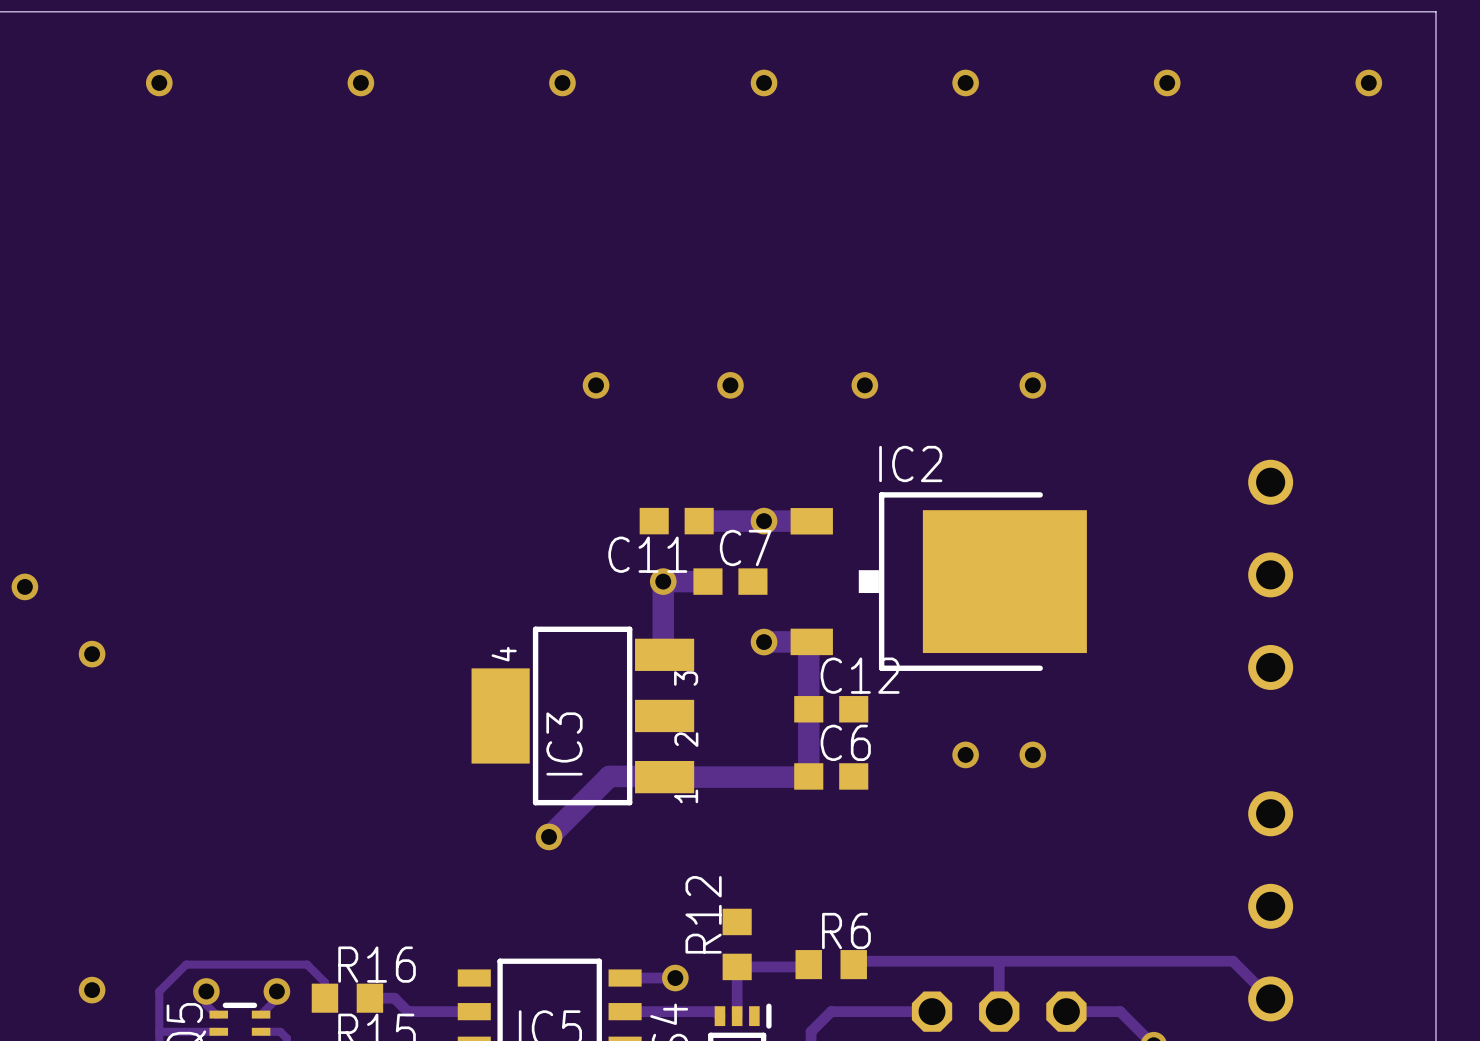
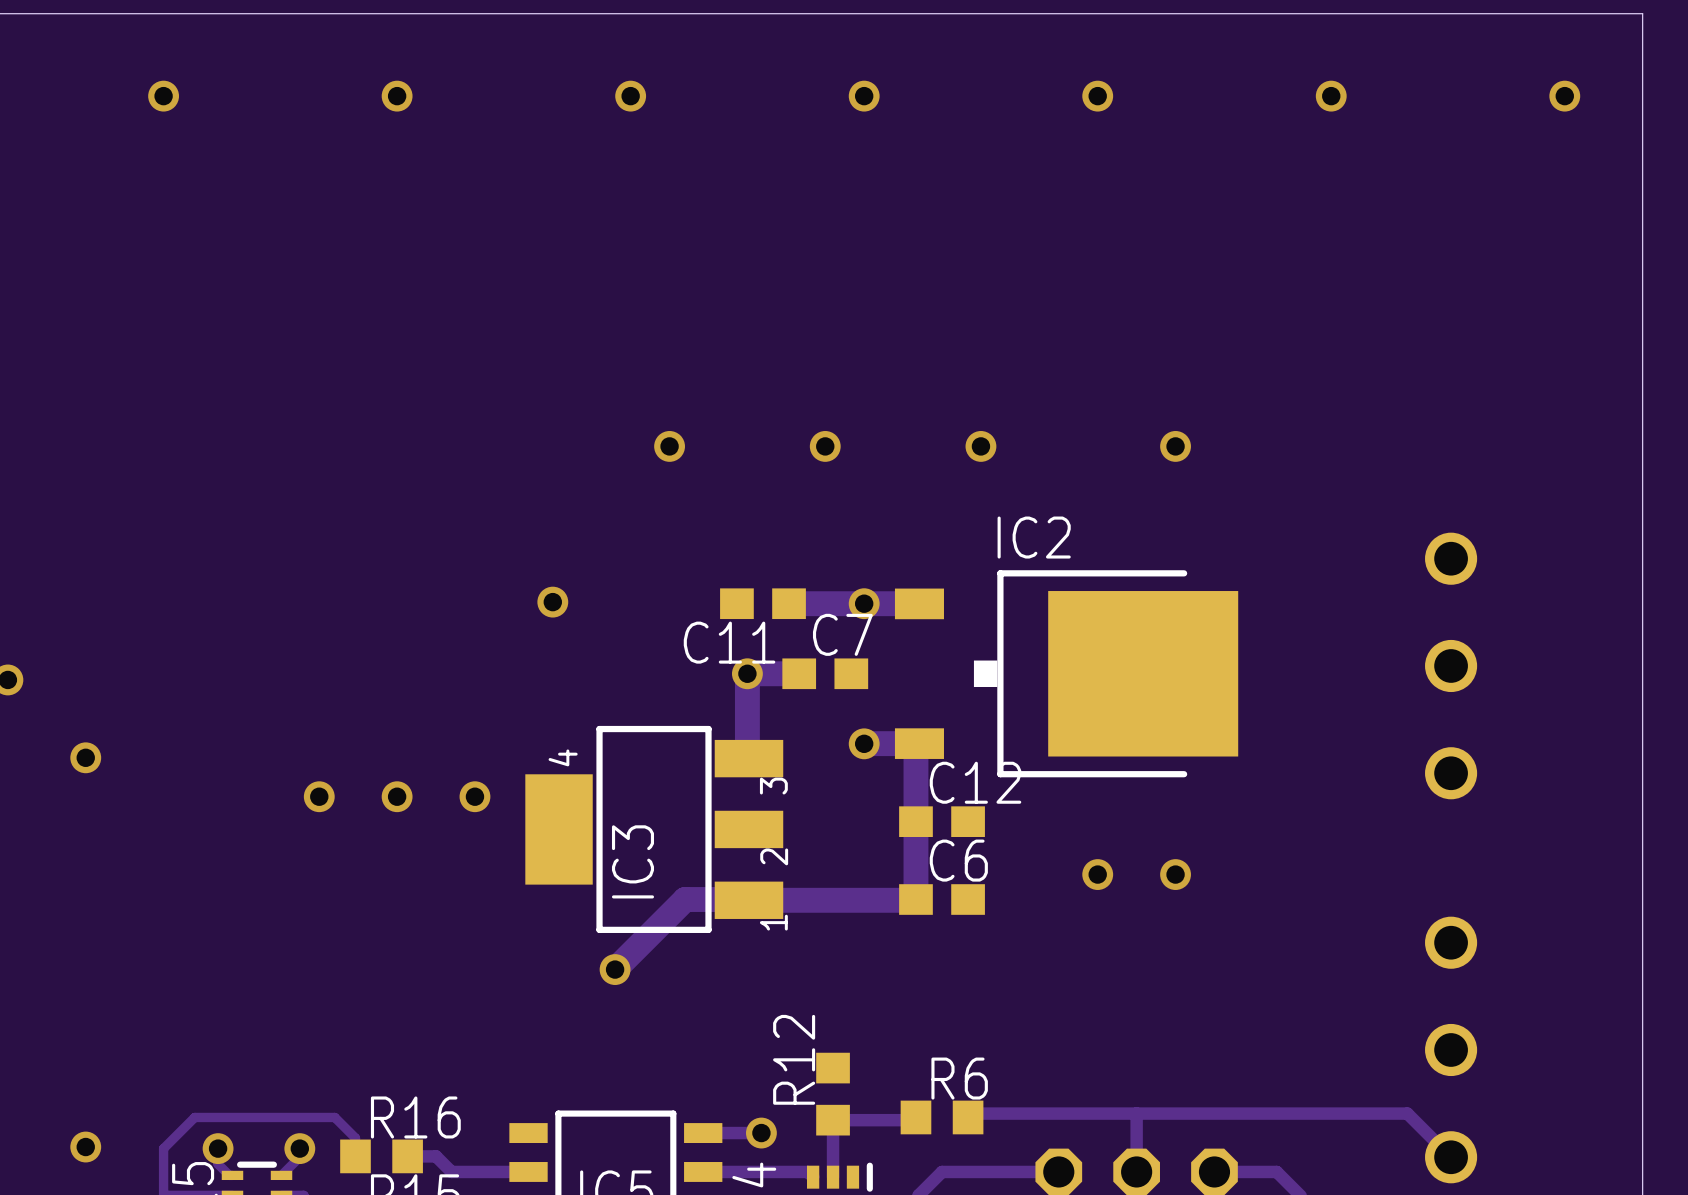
via: none -> (552, 602)
via: none -> (319, 796)
via: none -> (397, 796)
via: none -> (474, 796)

